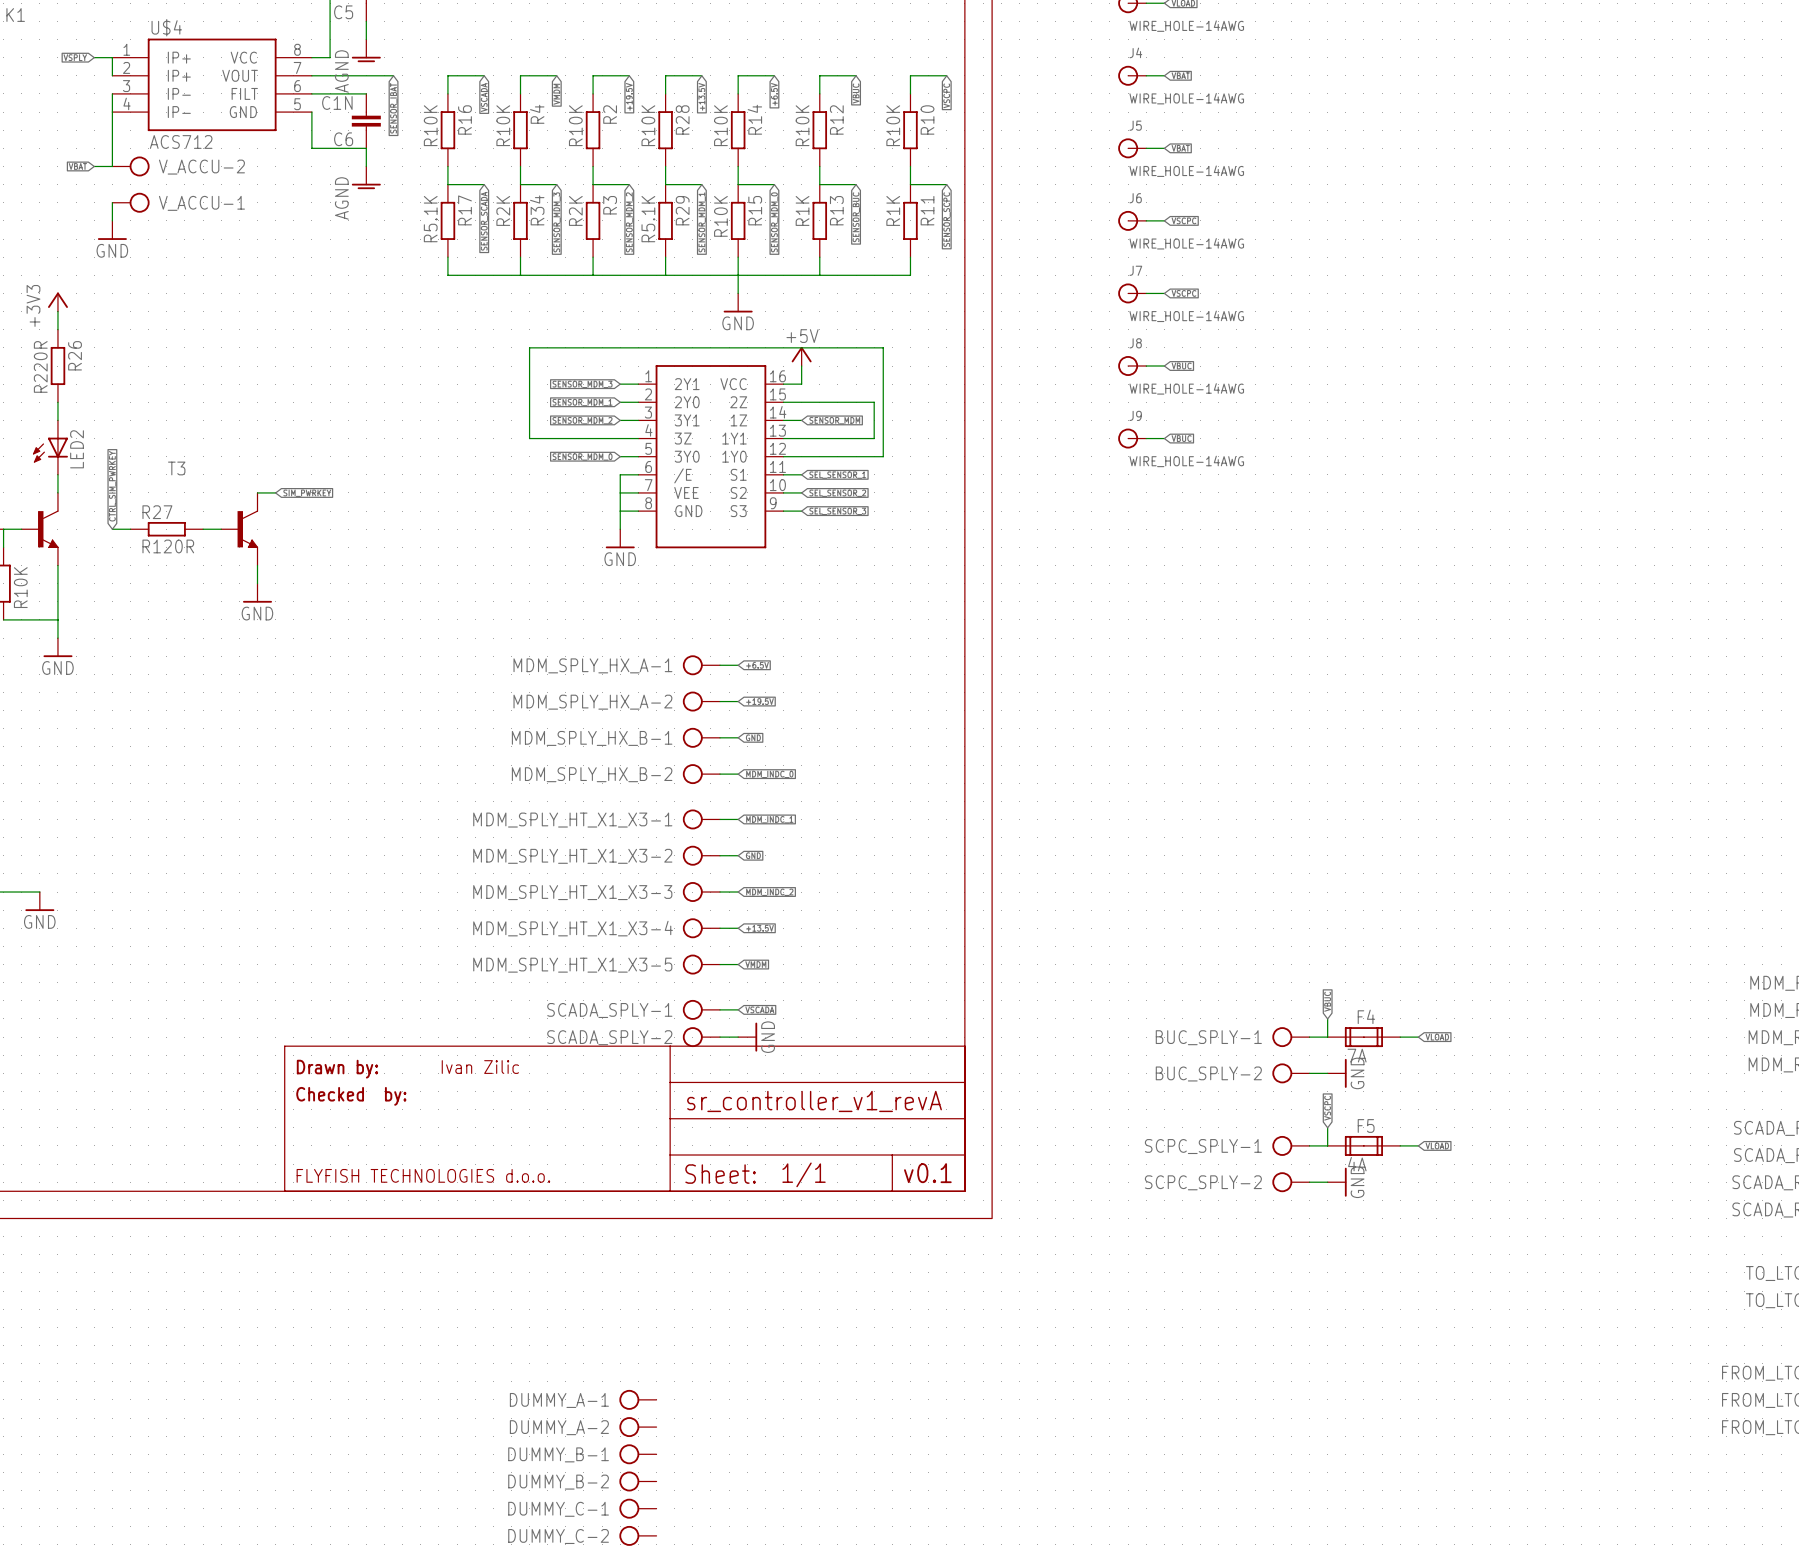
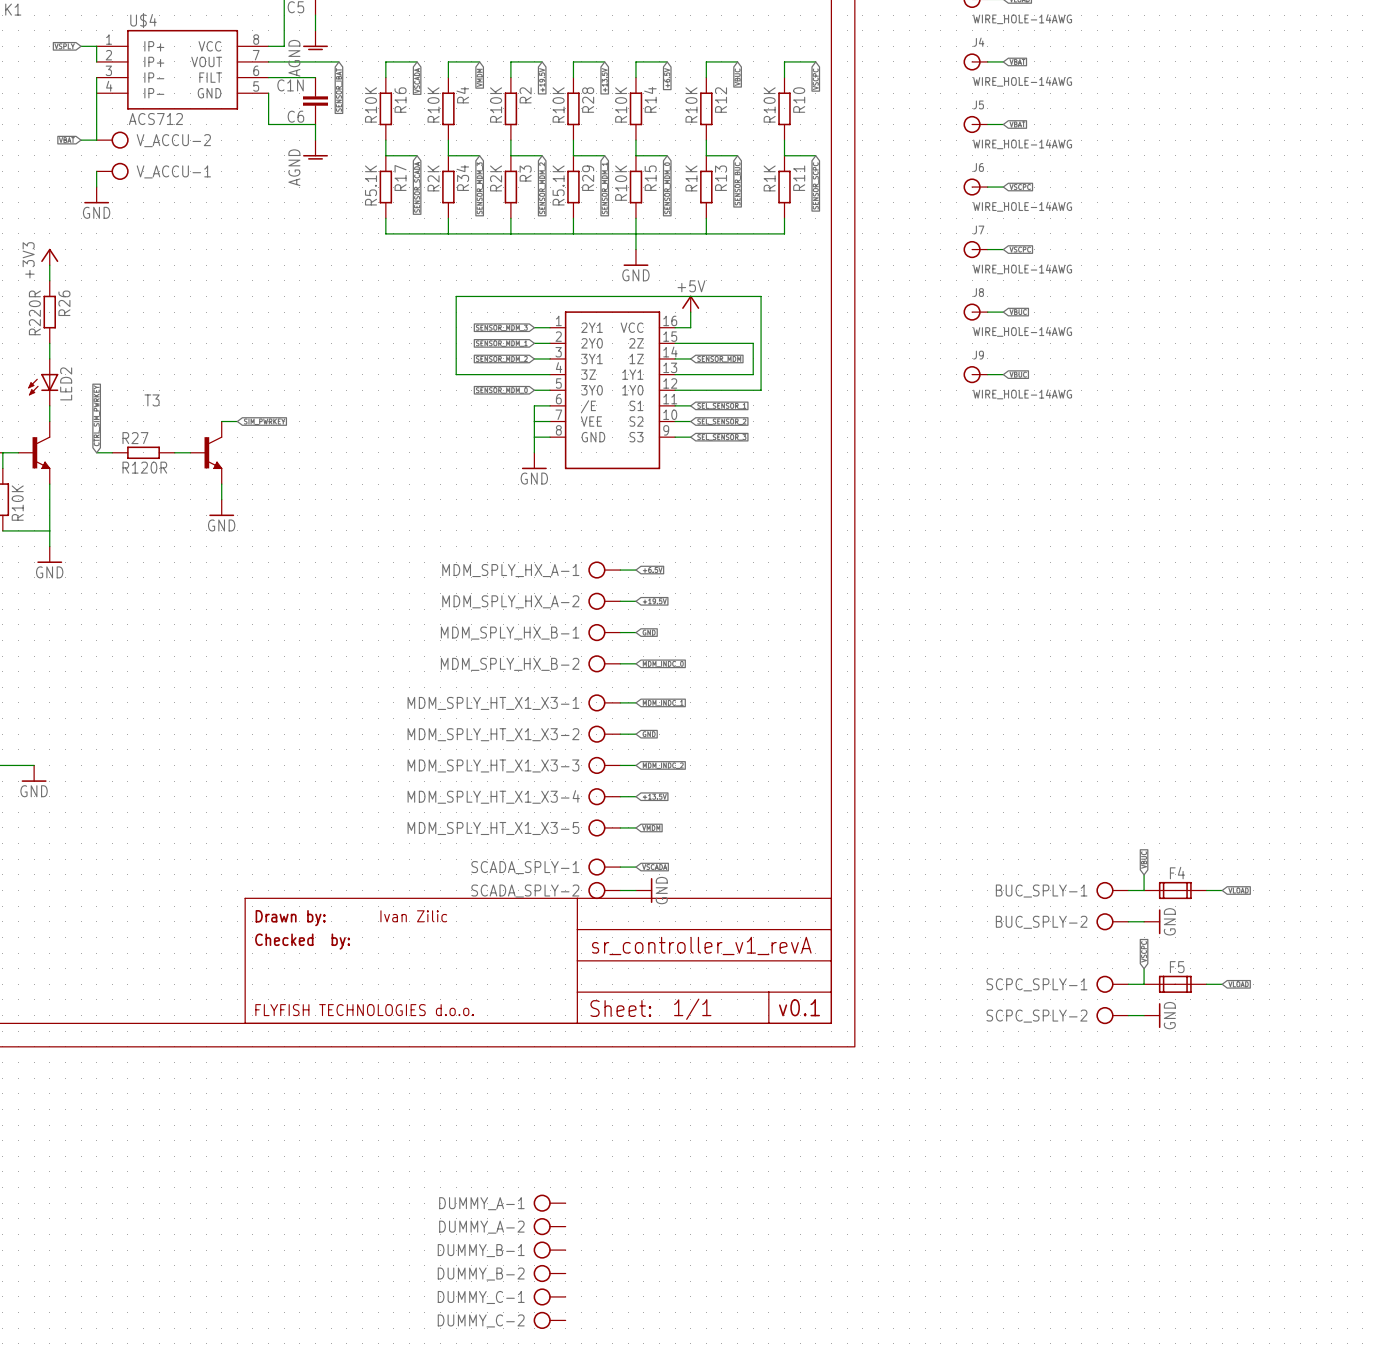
F4 value: 7A (1357, 1055) -> none
F5 value: 4A (1357, 1164) -> none

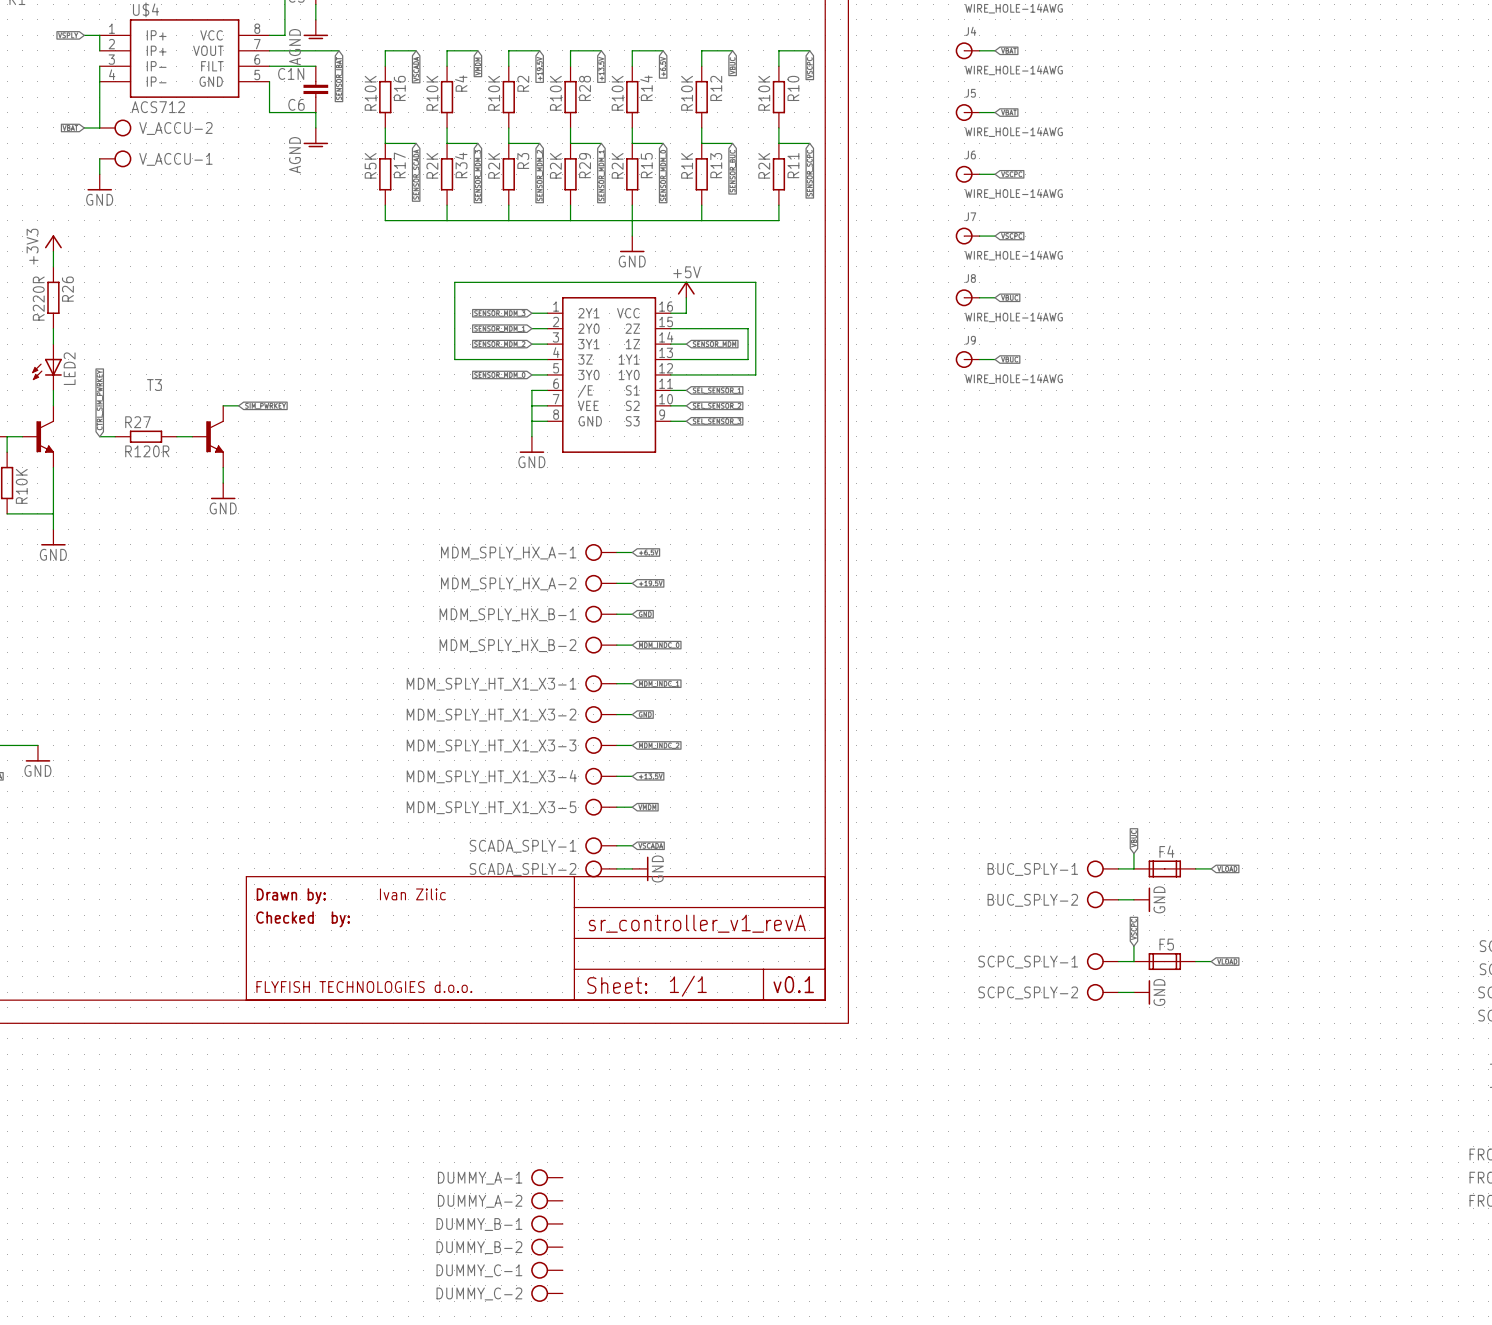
R11 value: R1K (769, 178) -> R2K (764, 165)
R15 value: R10K (621, 183) -> R2K (617, 165)
R17 value: R5.1K (371, 185) -> R5K (370, 165)
R29 value: R5.1K (558, 185) -> R2K (555, 165)

